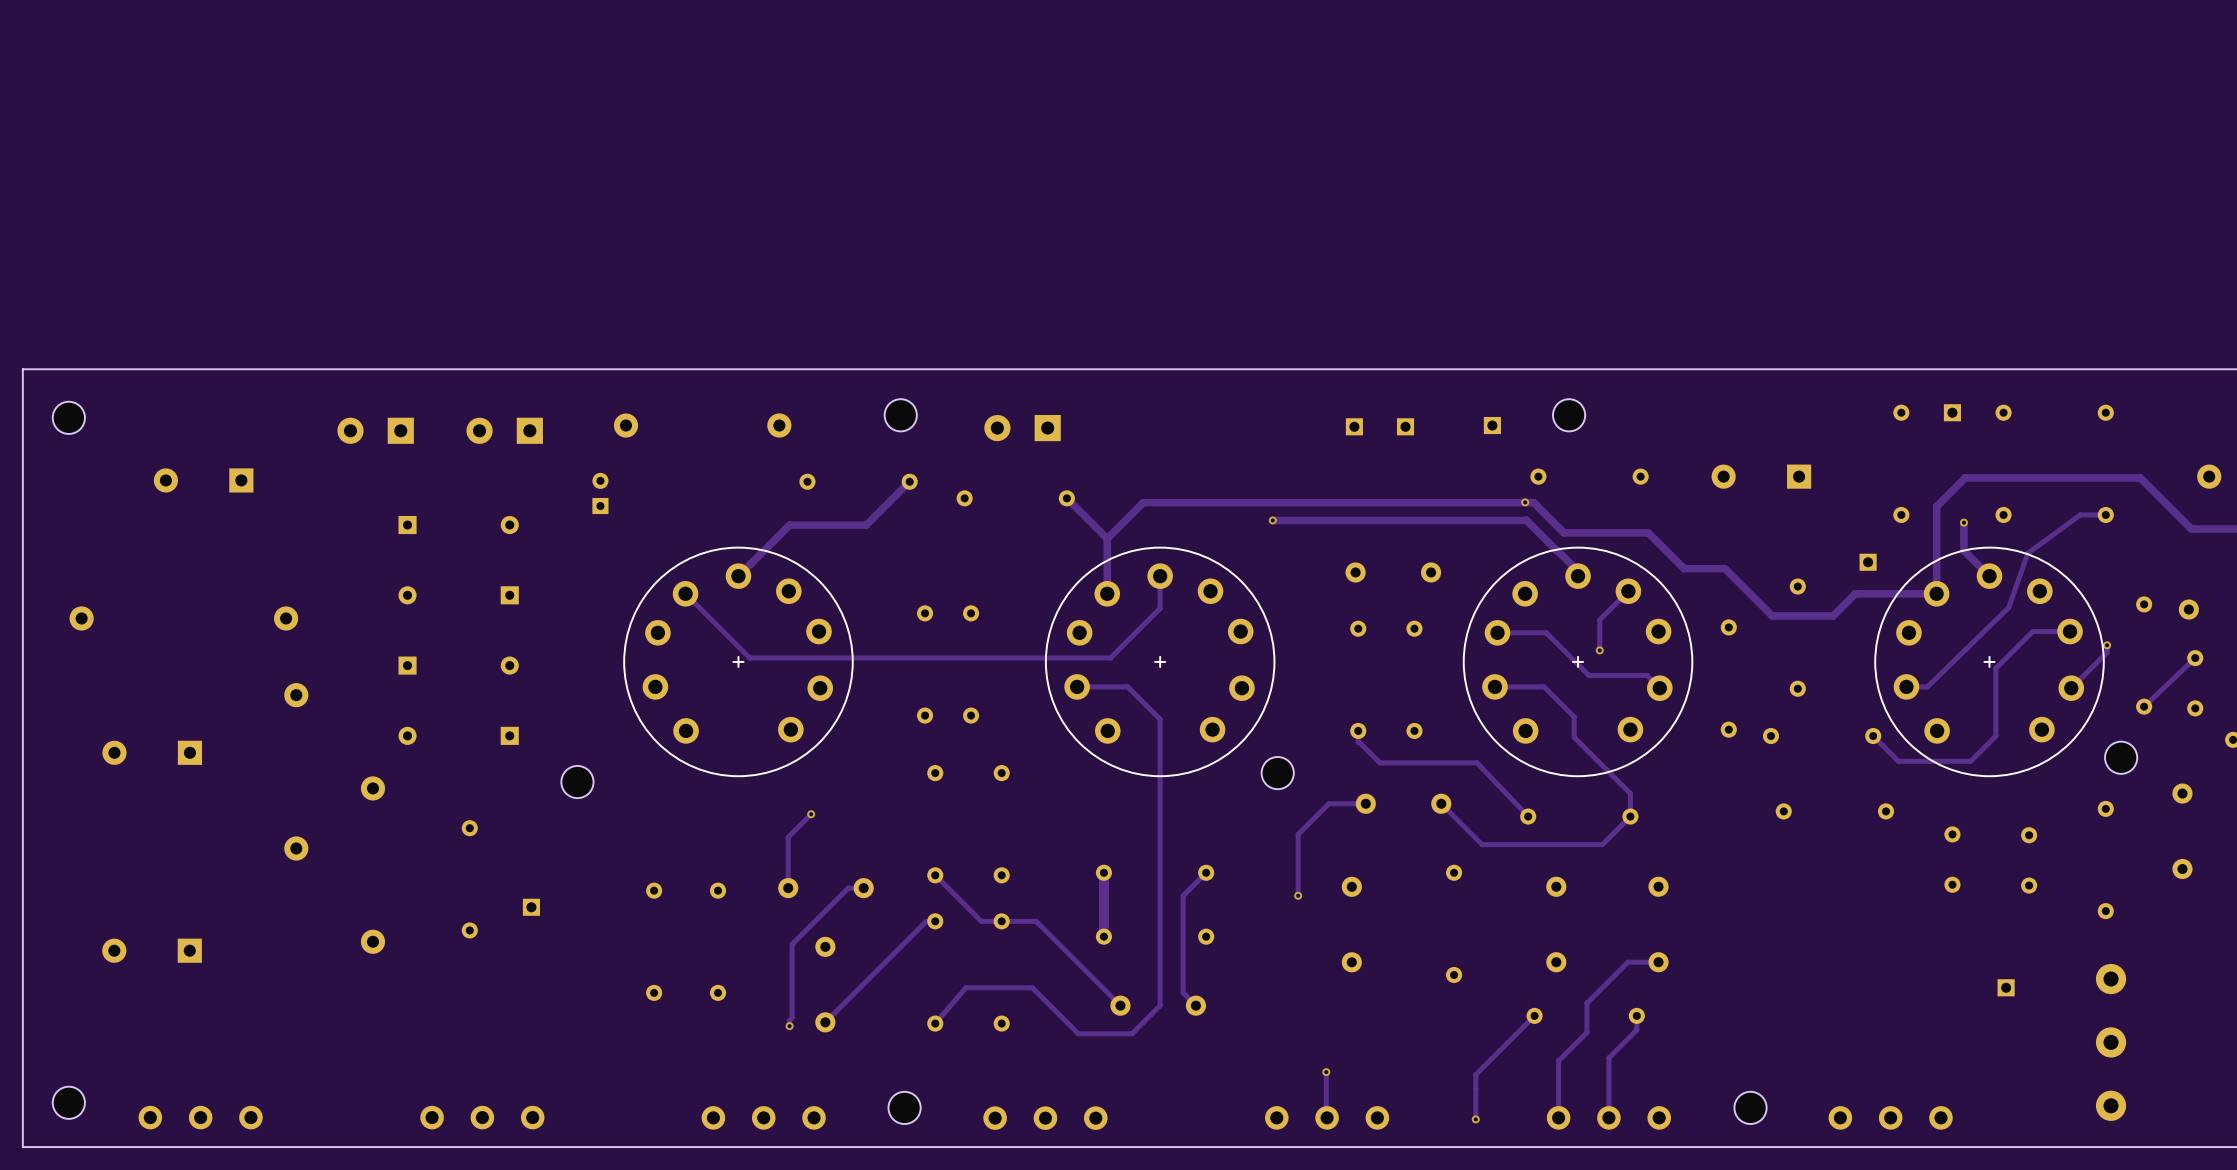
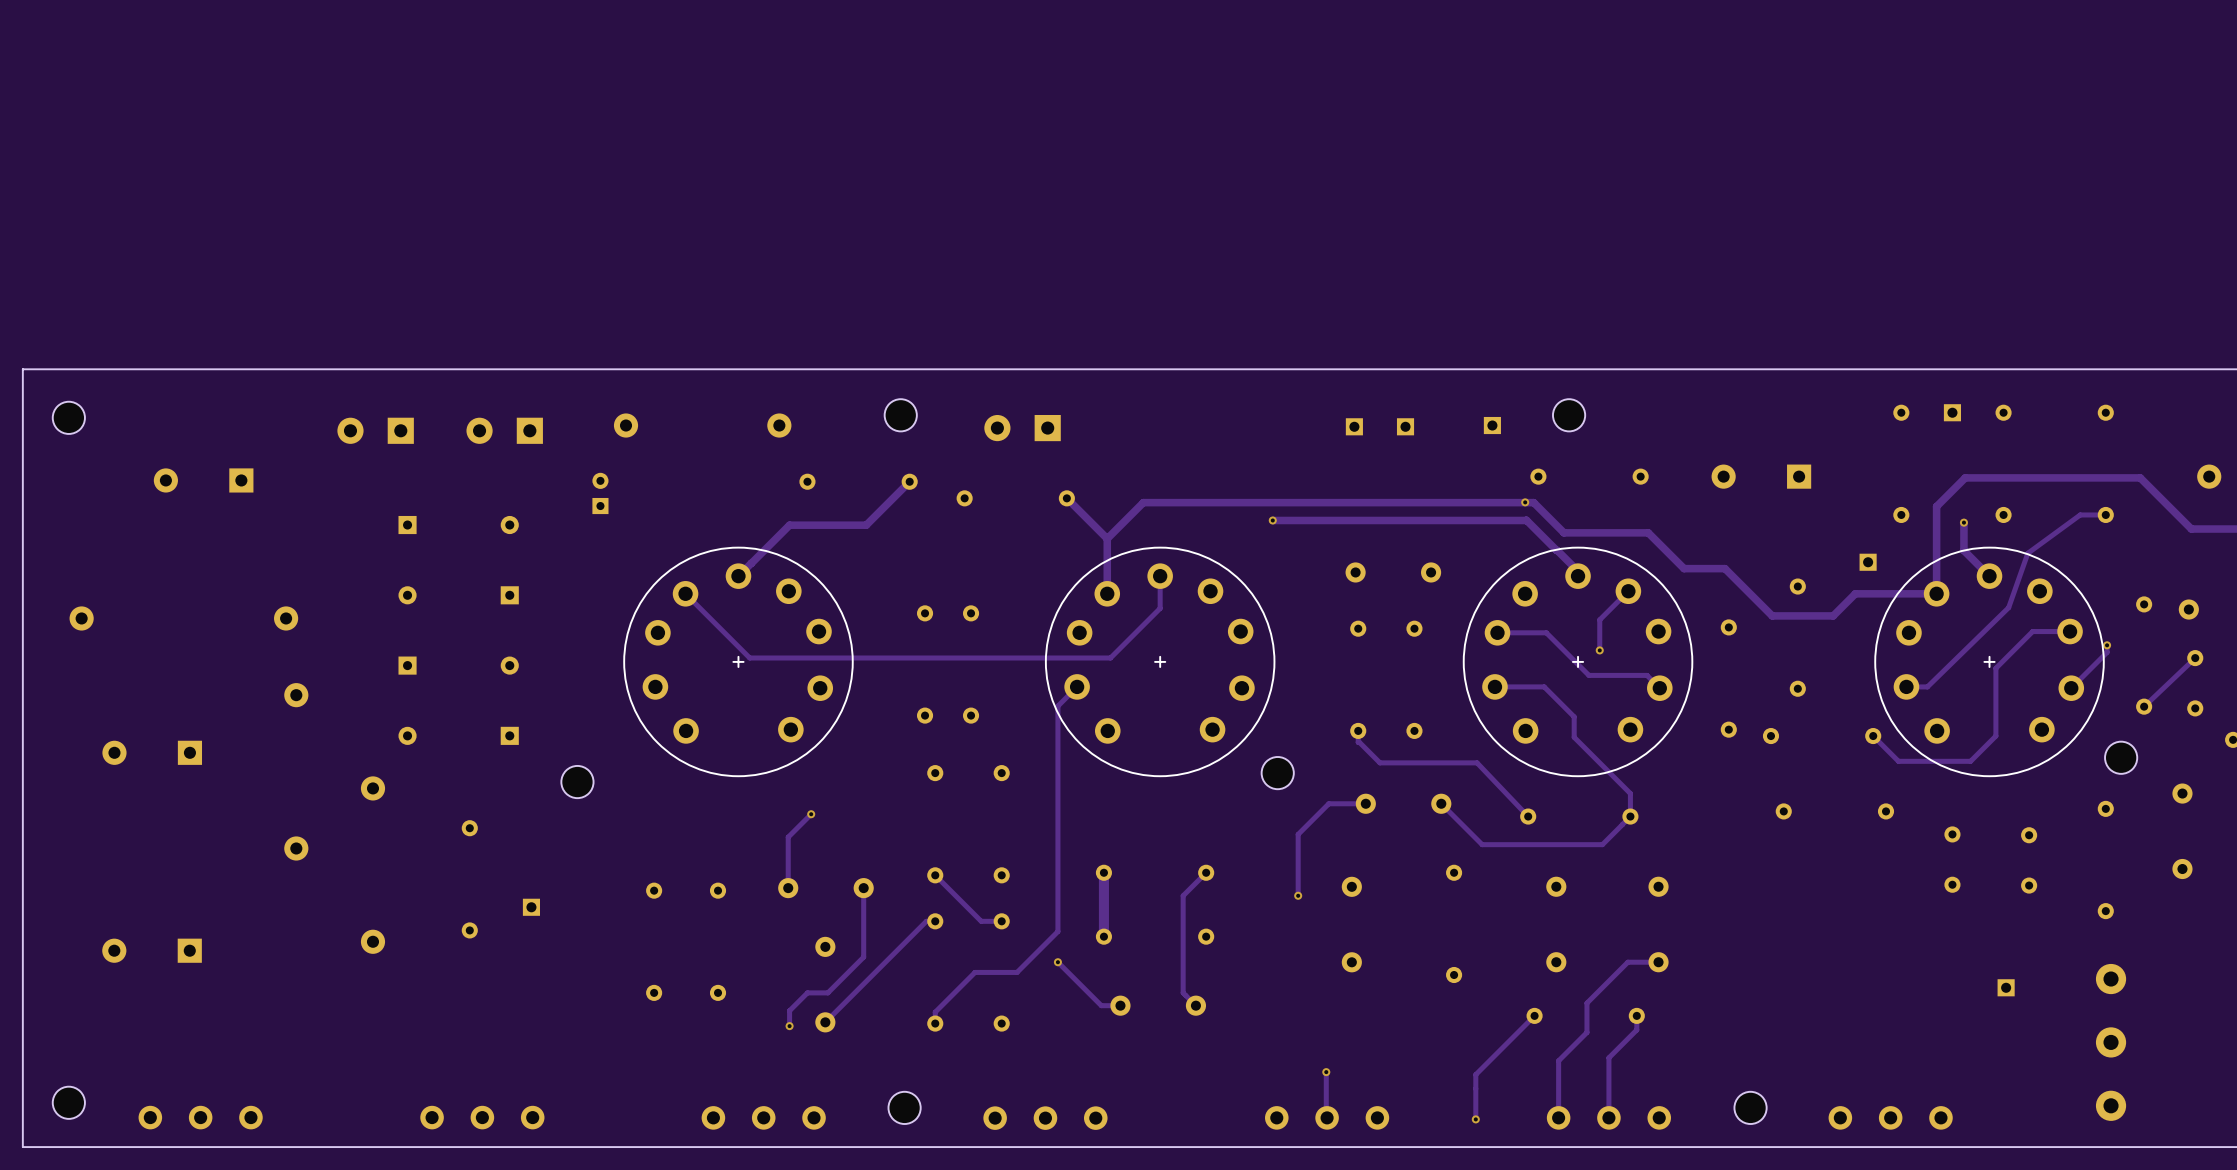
track: (1077, 686) (1127, 686) (1160, 719) (1160, 1005) (1132, 1033) (1078, 1033) (1032, 987) (965, 987) (935, 1023) -> (1077, 686) (1057, 706) (1057, 931) (1017, 972) (974, 972) (935, 1012) (935, 1023)
track: (863, 888) (848, 888) (792, 944) (792, 1017) (789, 1020) -> (863, 888) (863, 957) (827, 992) (807, 992) (789, 1010) (789, 1020)
track: (1001, 921) (1036, 921) (1120, 1005) -> (1057, 962) (1101, 1005) (1120, 1005)
via: none -> (1057, 962)

